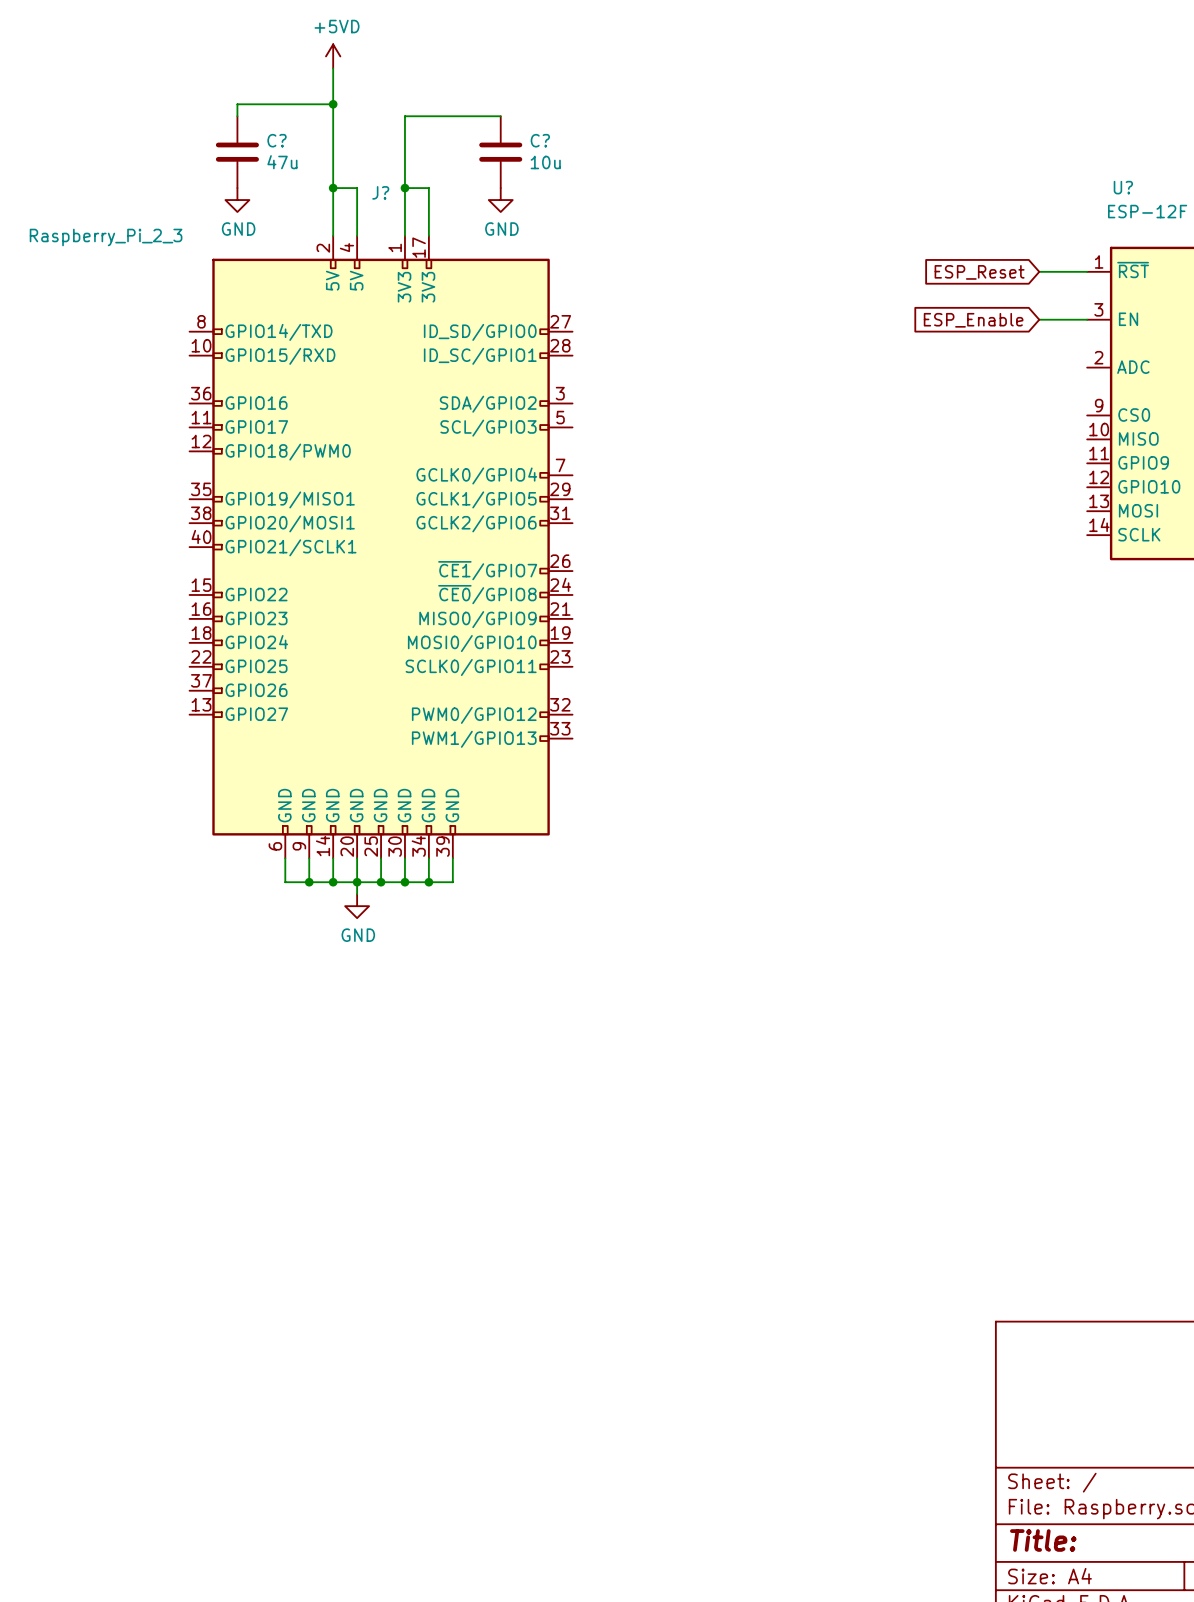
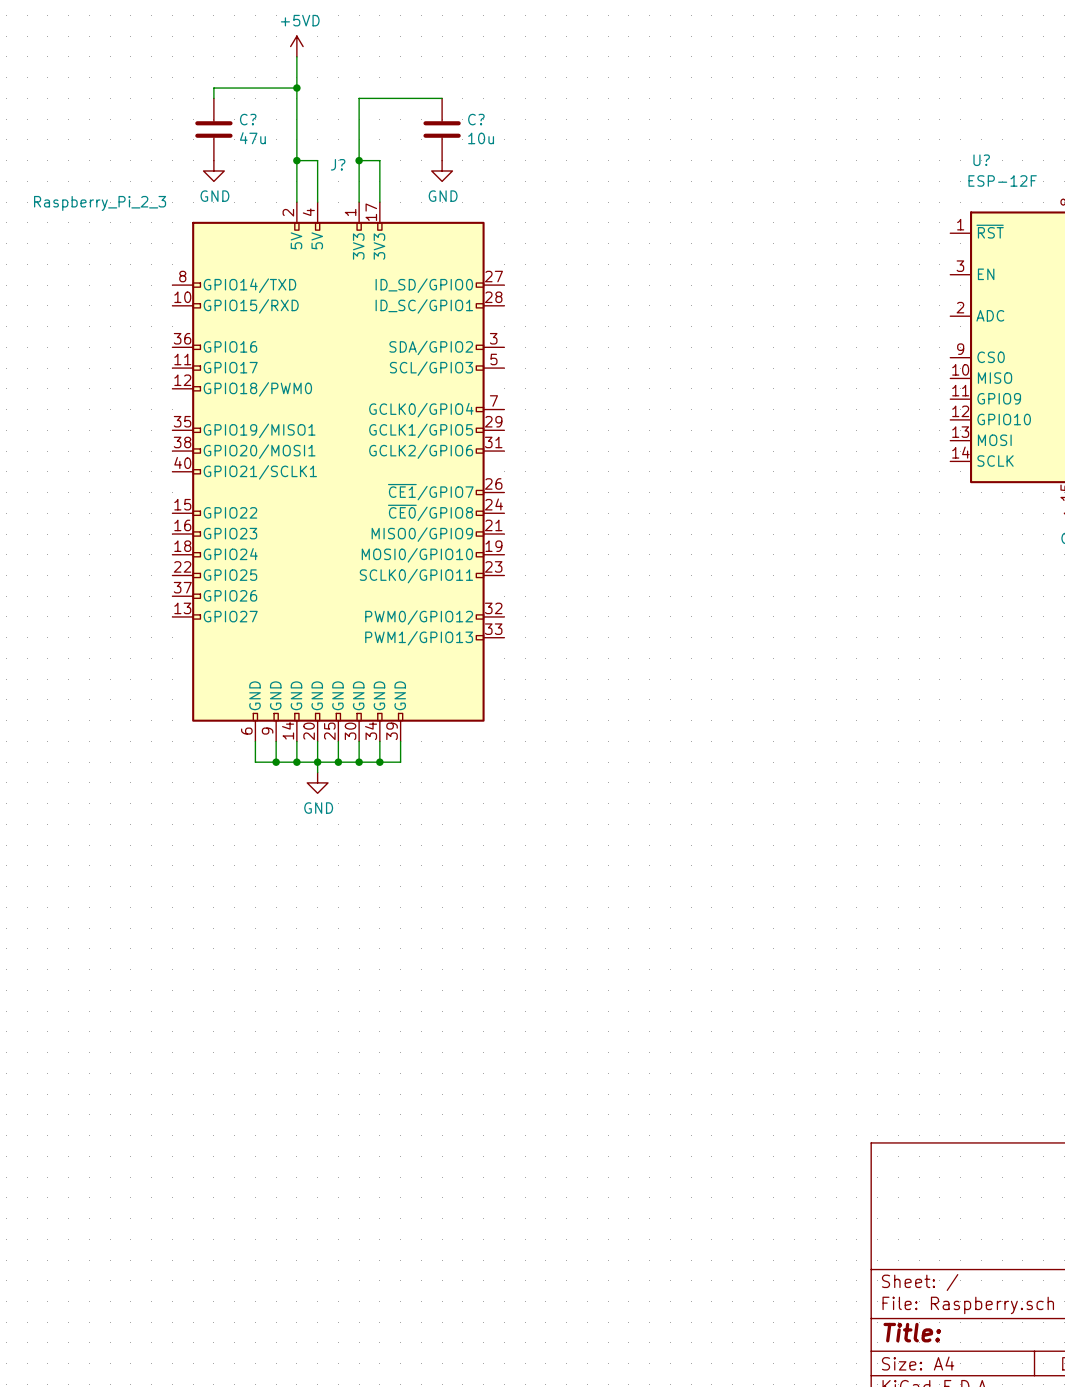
wire: (1039, 271) (1087, 271) -> none
global label: ESP_Reset (979, 272) -> none
wire: (1039, 319) (1087, 319) -> none
global label: ESP_Enable (973, 320) -> none

